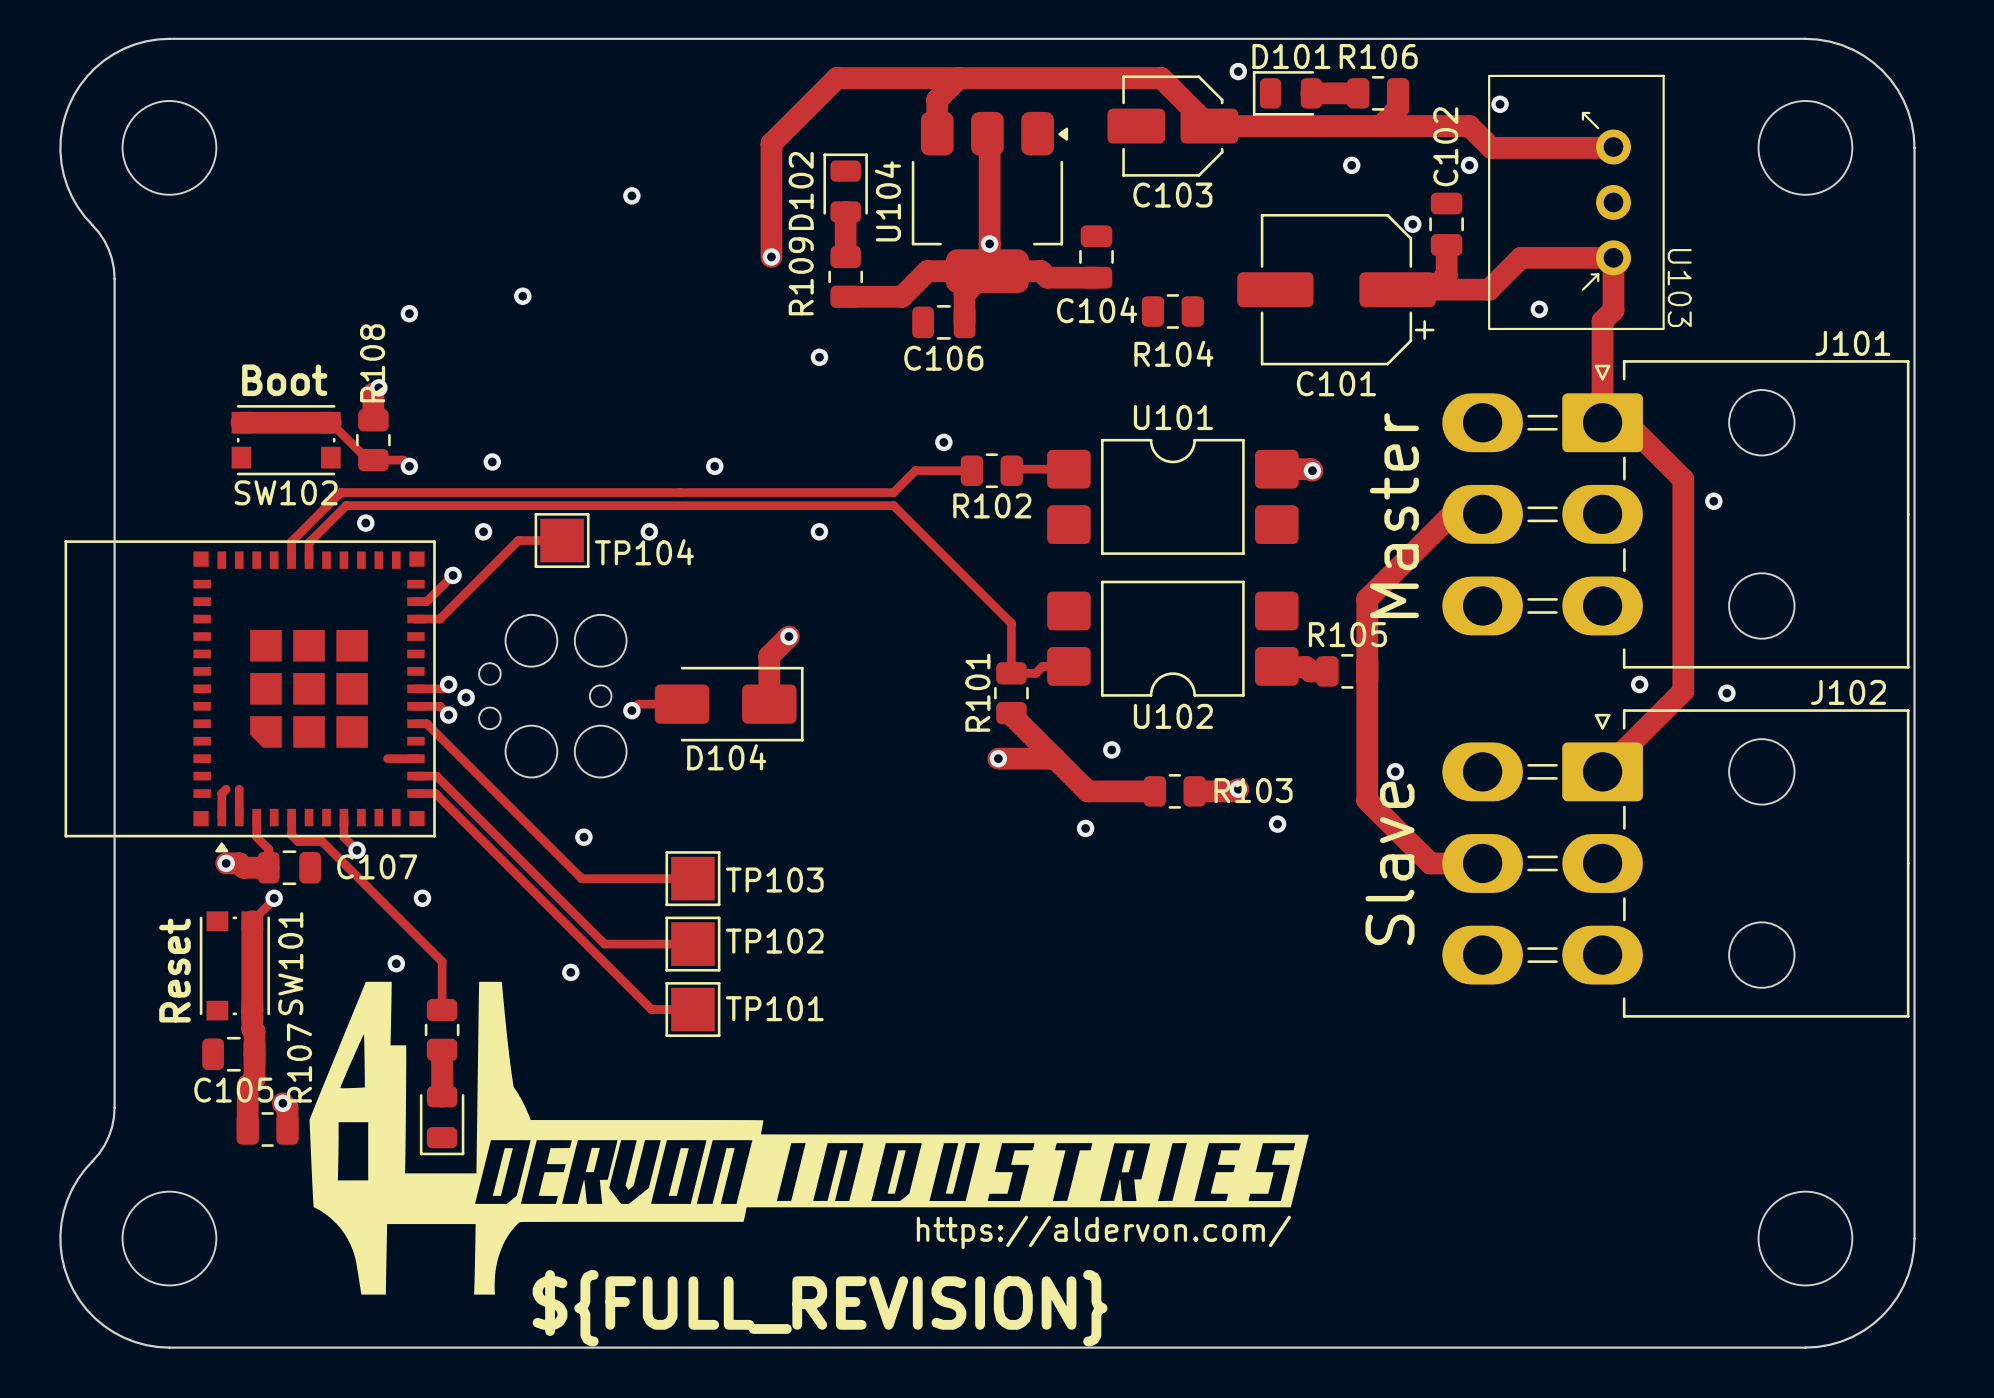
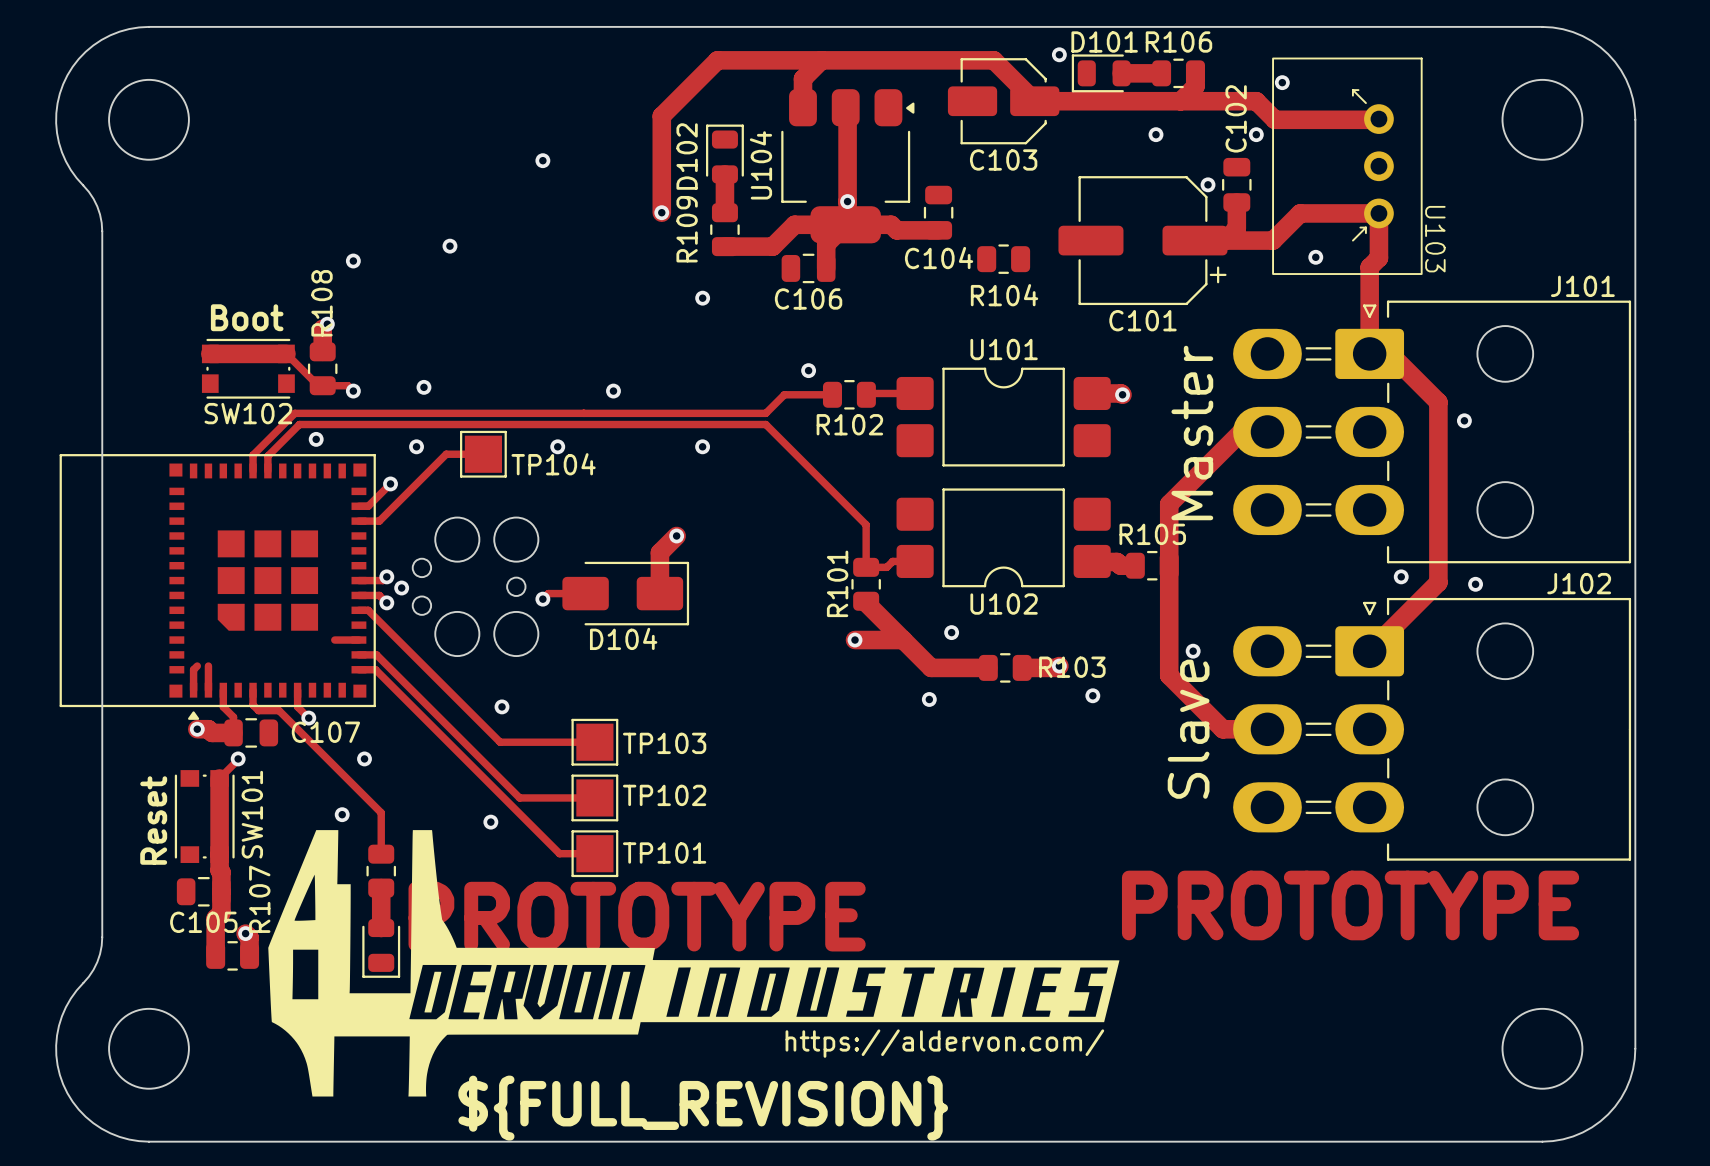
text: none -> PROTOTYPE (1350, 905)
text: none -> PROTOTYPE (637, 916)

